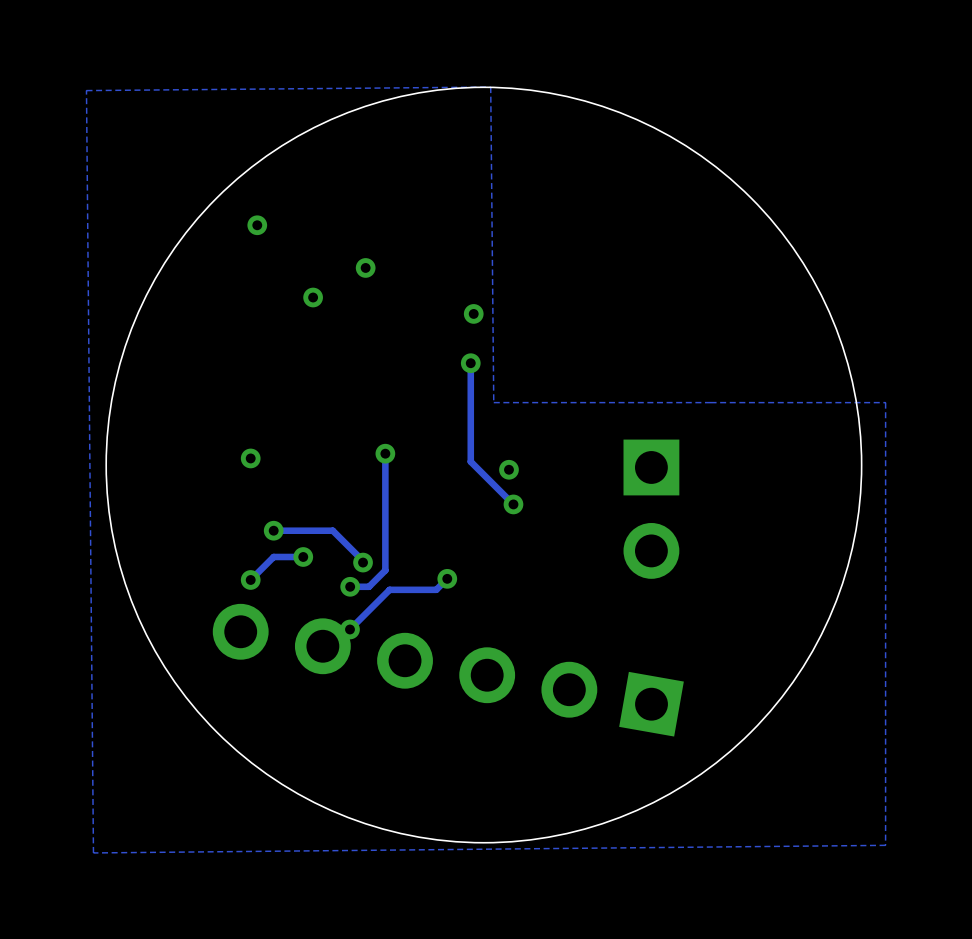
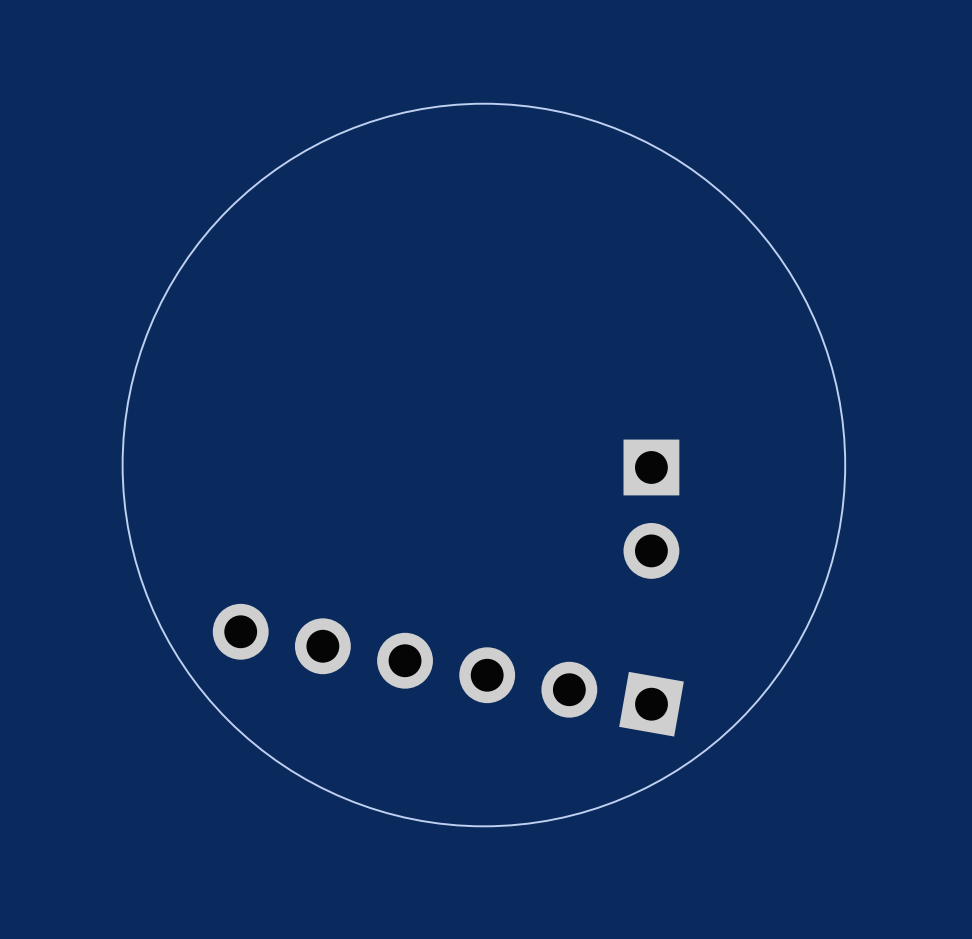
round board edge size: [105, 86, 863, 844] -> [121, 102, 847, 828]
zone outline: (490, 87) (86, 90) (93, 852) (885, 845) (885, 402) (493, 402) (490, 87) -> none
via: (257, 225) -> none
via: (365, 267) -> none
via: (313, 297) -> none
via: (473, 313) -> none
track: (470, 363) (470, 461) (513, 504) -> none
via: (470, 363) -> none
track: (385, 453) (385, 570) (369, 586) (350, 586) -> none
via: (385, 453) -> none
via: (250, 458) -> none
via: (508, 469) -> none
via: (513, 504) -> none
track: (273, 530) (332, 530) (363, 562) (367, 562) -> none
via: (273, 530) -> none
track: (303, 556) (273, 556) (250, 579) -> none
via: (303, 556) -> none
via: (363, 562) -> none
track: (447, 578) (436, 589) (389, 589) (349, 629) -> none
via: (447, 578) -> none
via: (250, 579) -> none
via: (350, 586) -> none
via: (349, 629) -> none

